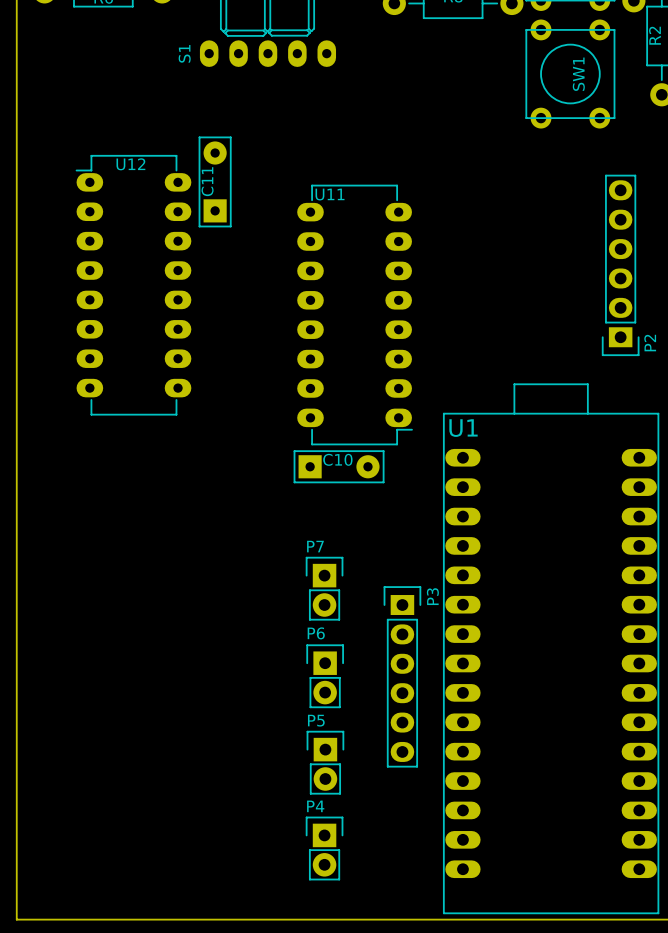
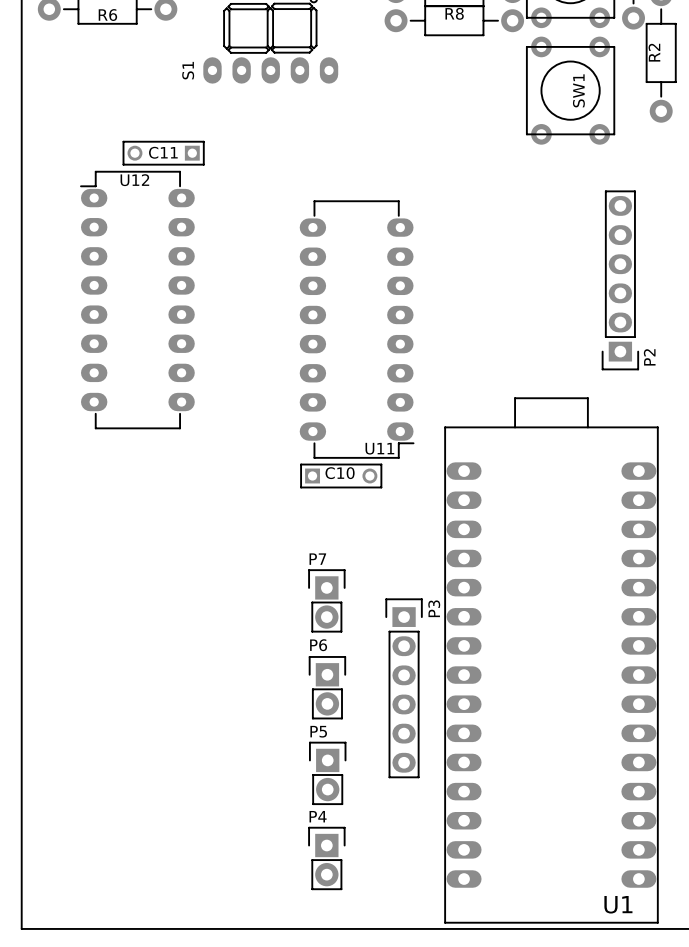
C11 footprint: [198, 136, 232, 228] -> [122, 140, 205, 166]
U11 name position: U11 (330, 194) -> U11 (379, 448)
U1 name position: U1 (463, 428) -> U1 (618, 904)
C10 footprint: [293, 450, 385, 484] -> [300, 463, 383, 489]

